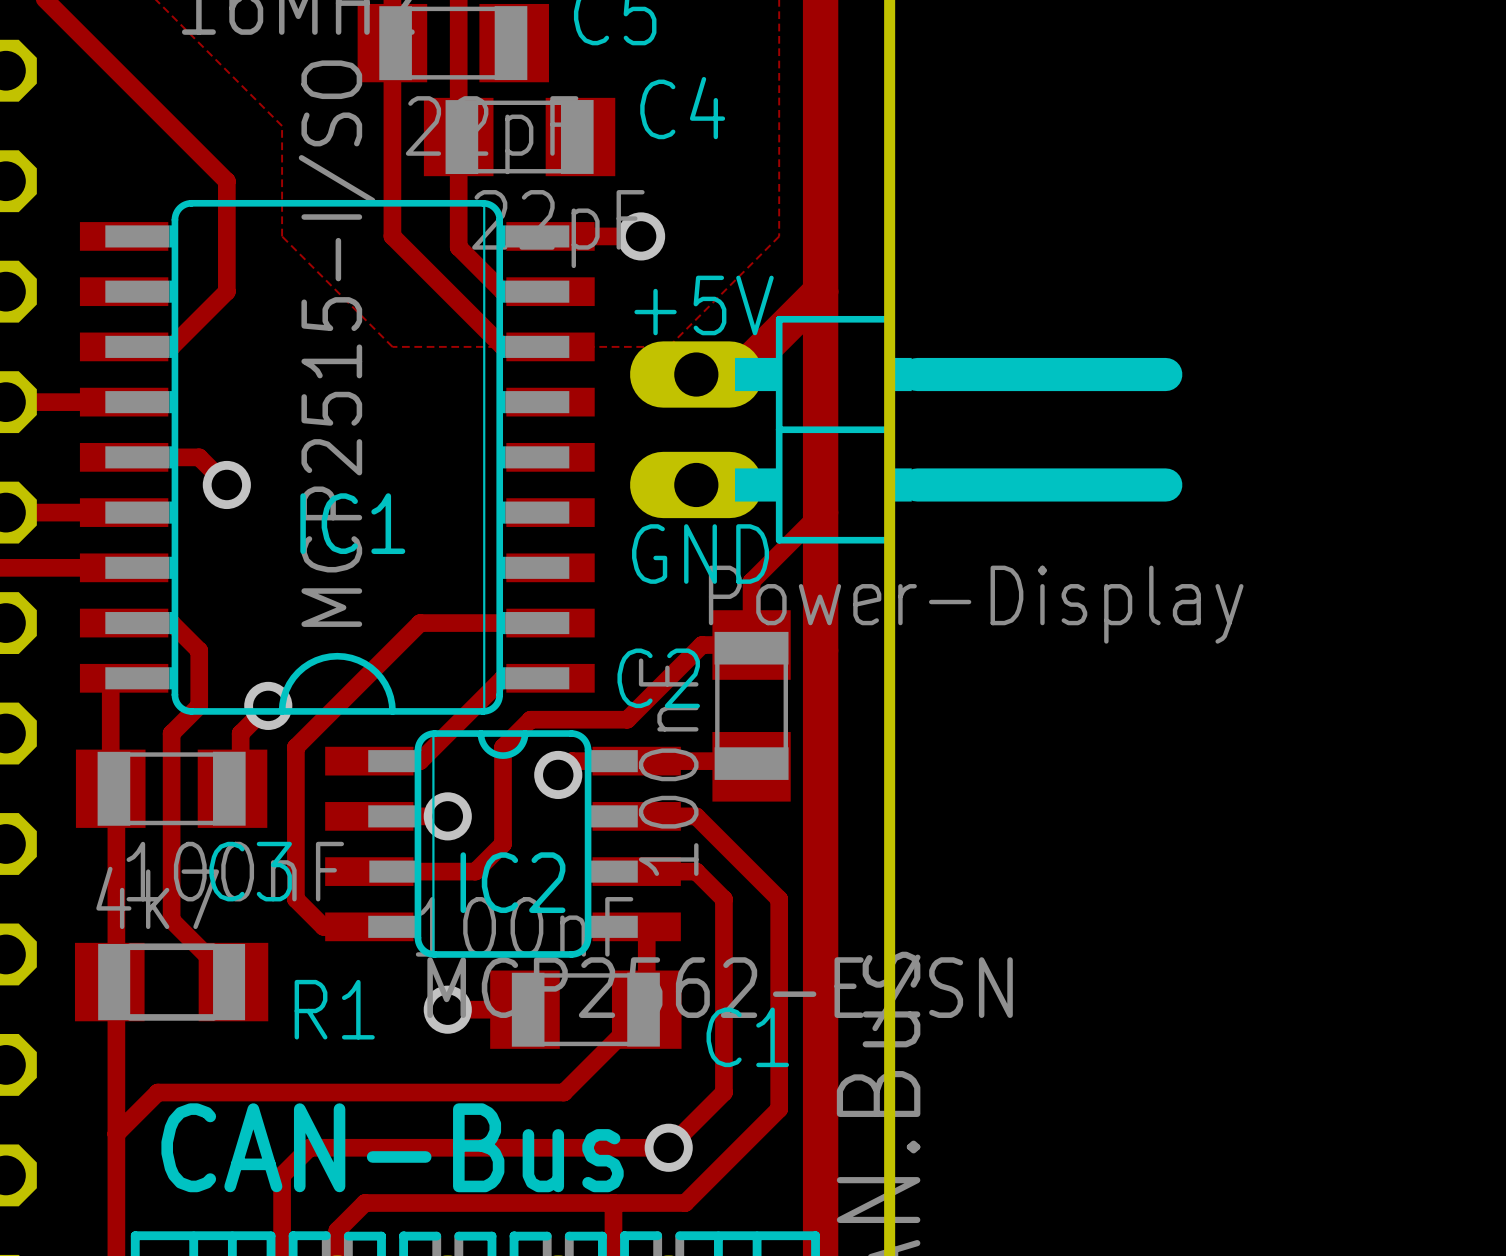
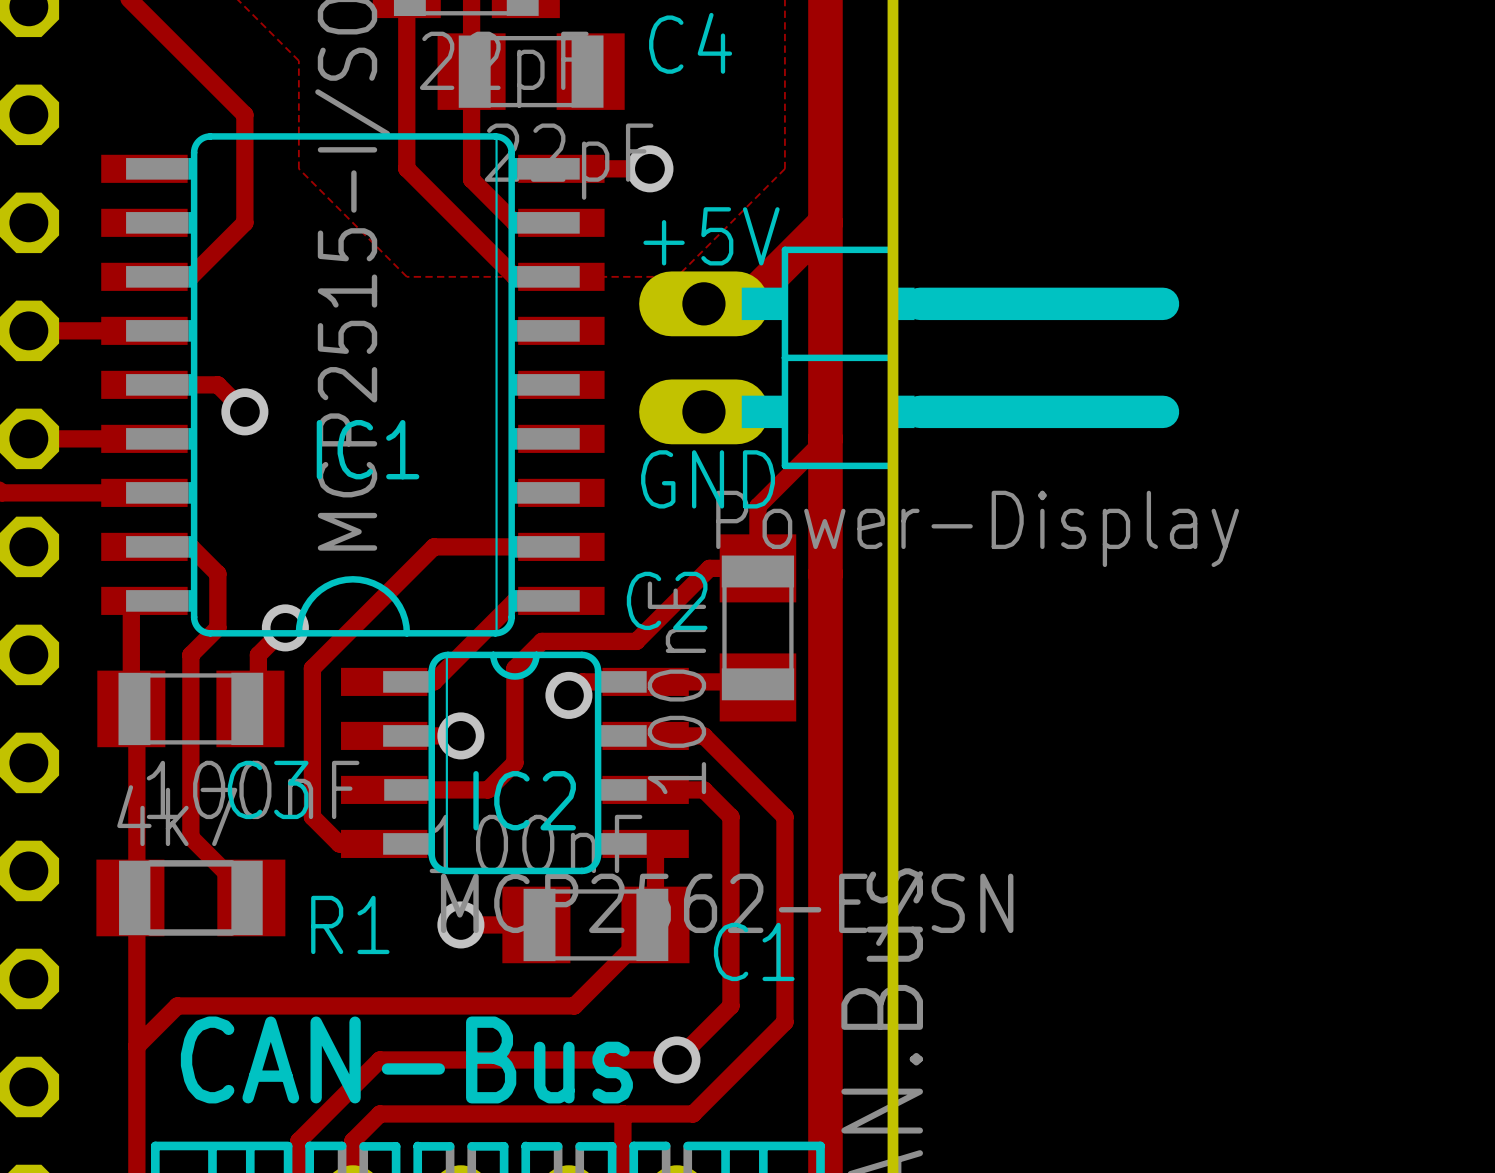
track: (364, 1147) (309, 1147) (282, 1175) (282, 1230) -> (379, 1059) (298, 1140)

